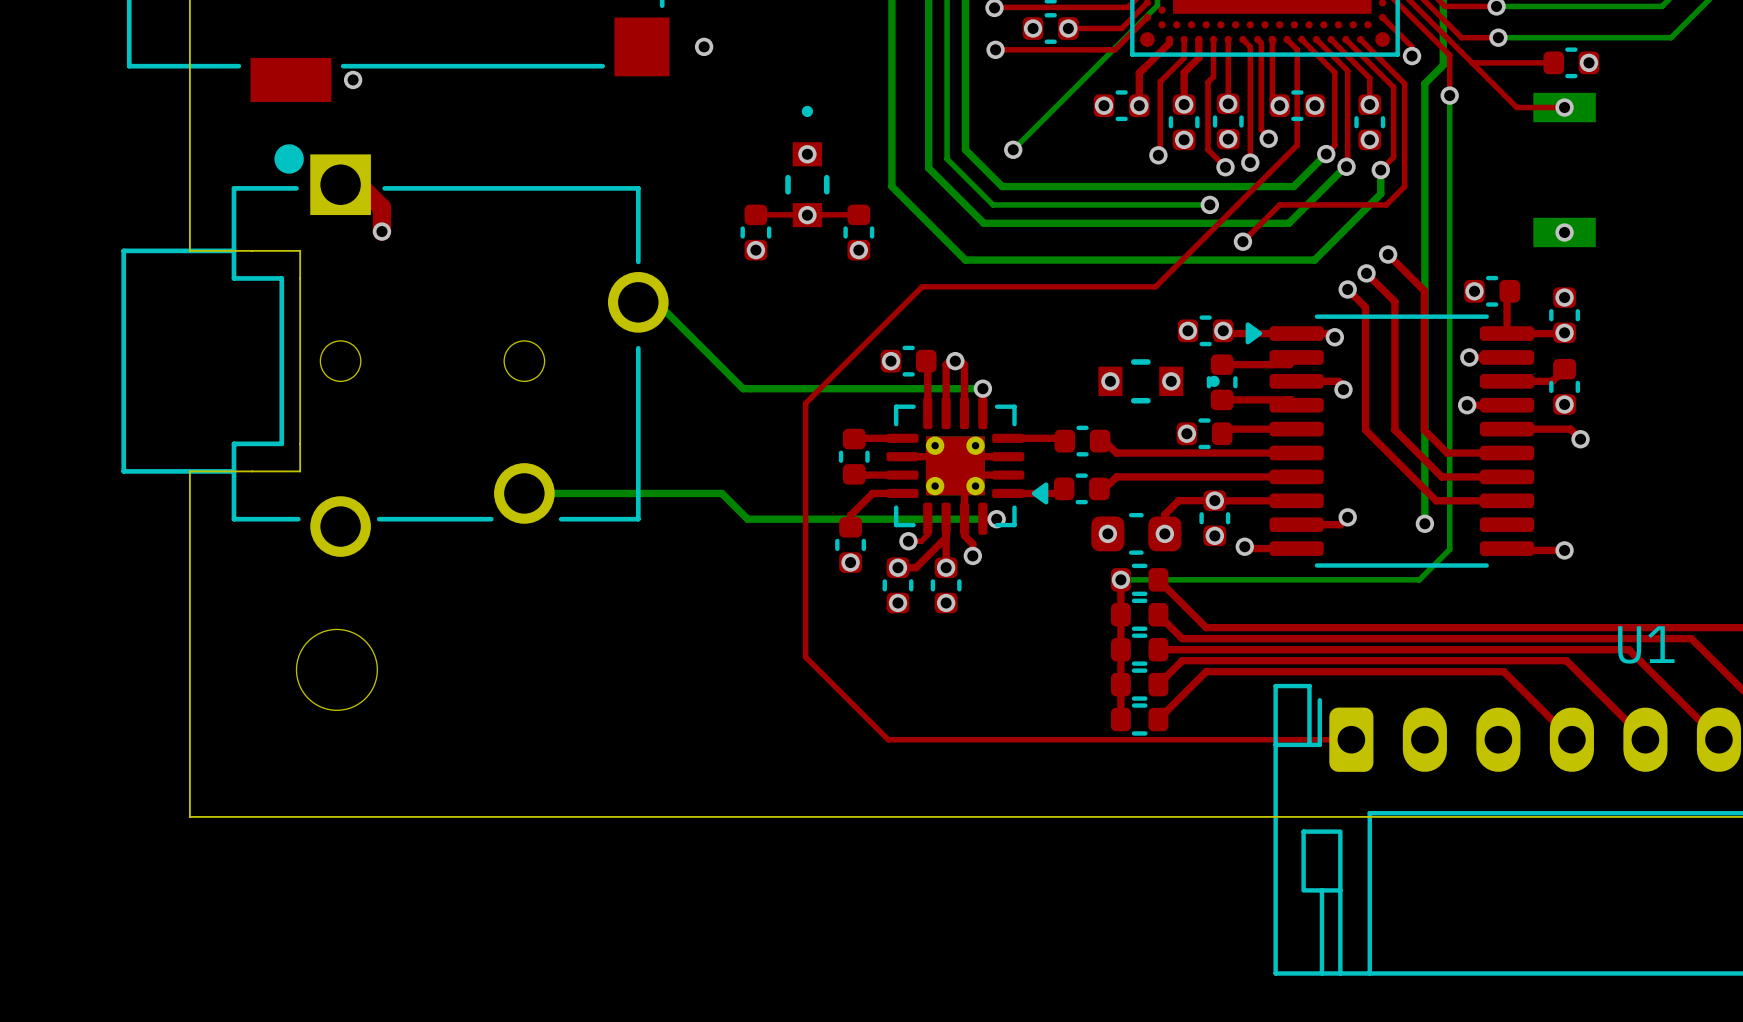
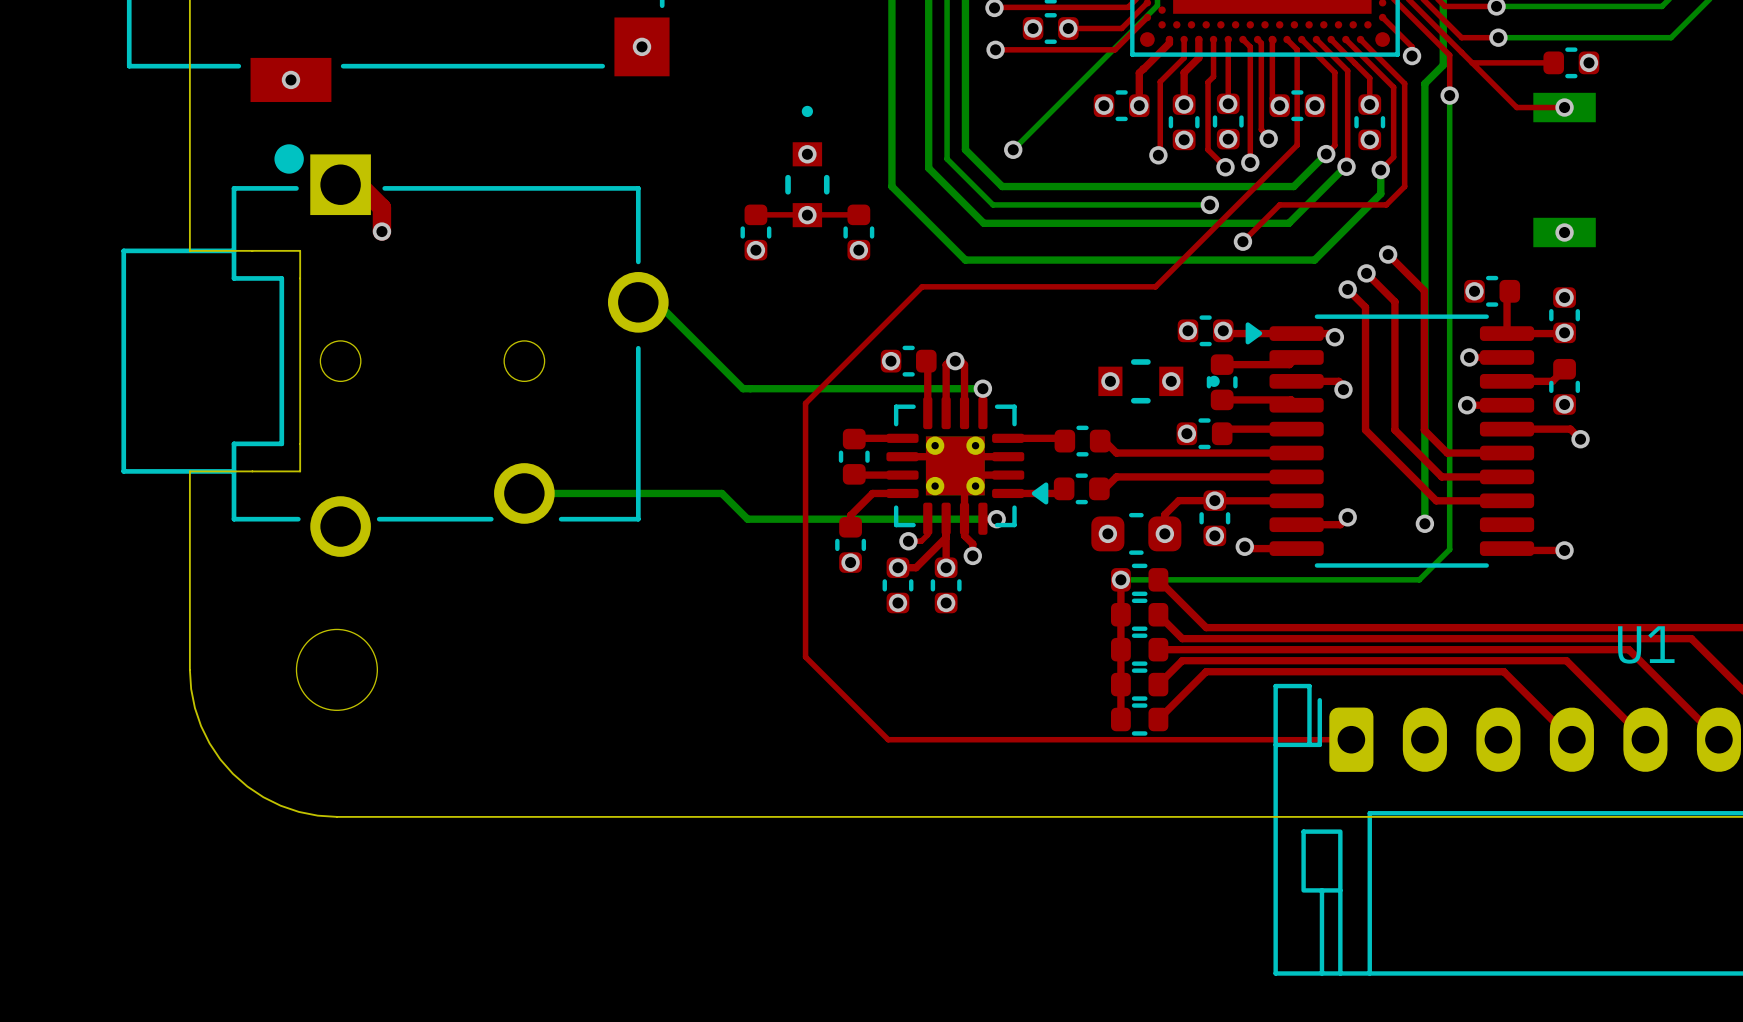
via position: (704, 46) -> (641, 46)
via position: (353, 79) -> (290, 79)
board edge: (189, 669) (189, 816) (336, 816) -> (189, 669) (191, 689) (201, 726) (220, 759) (232, 773) (263, 797) (280, 805) (298, 811) (336, 816)

